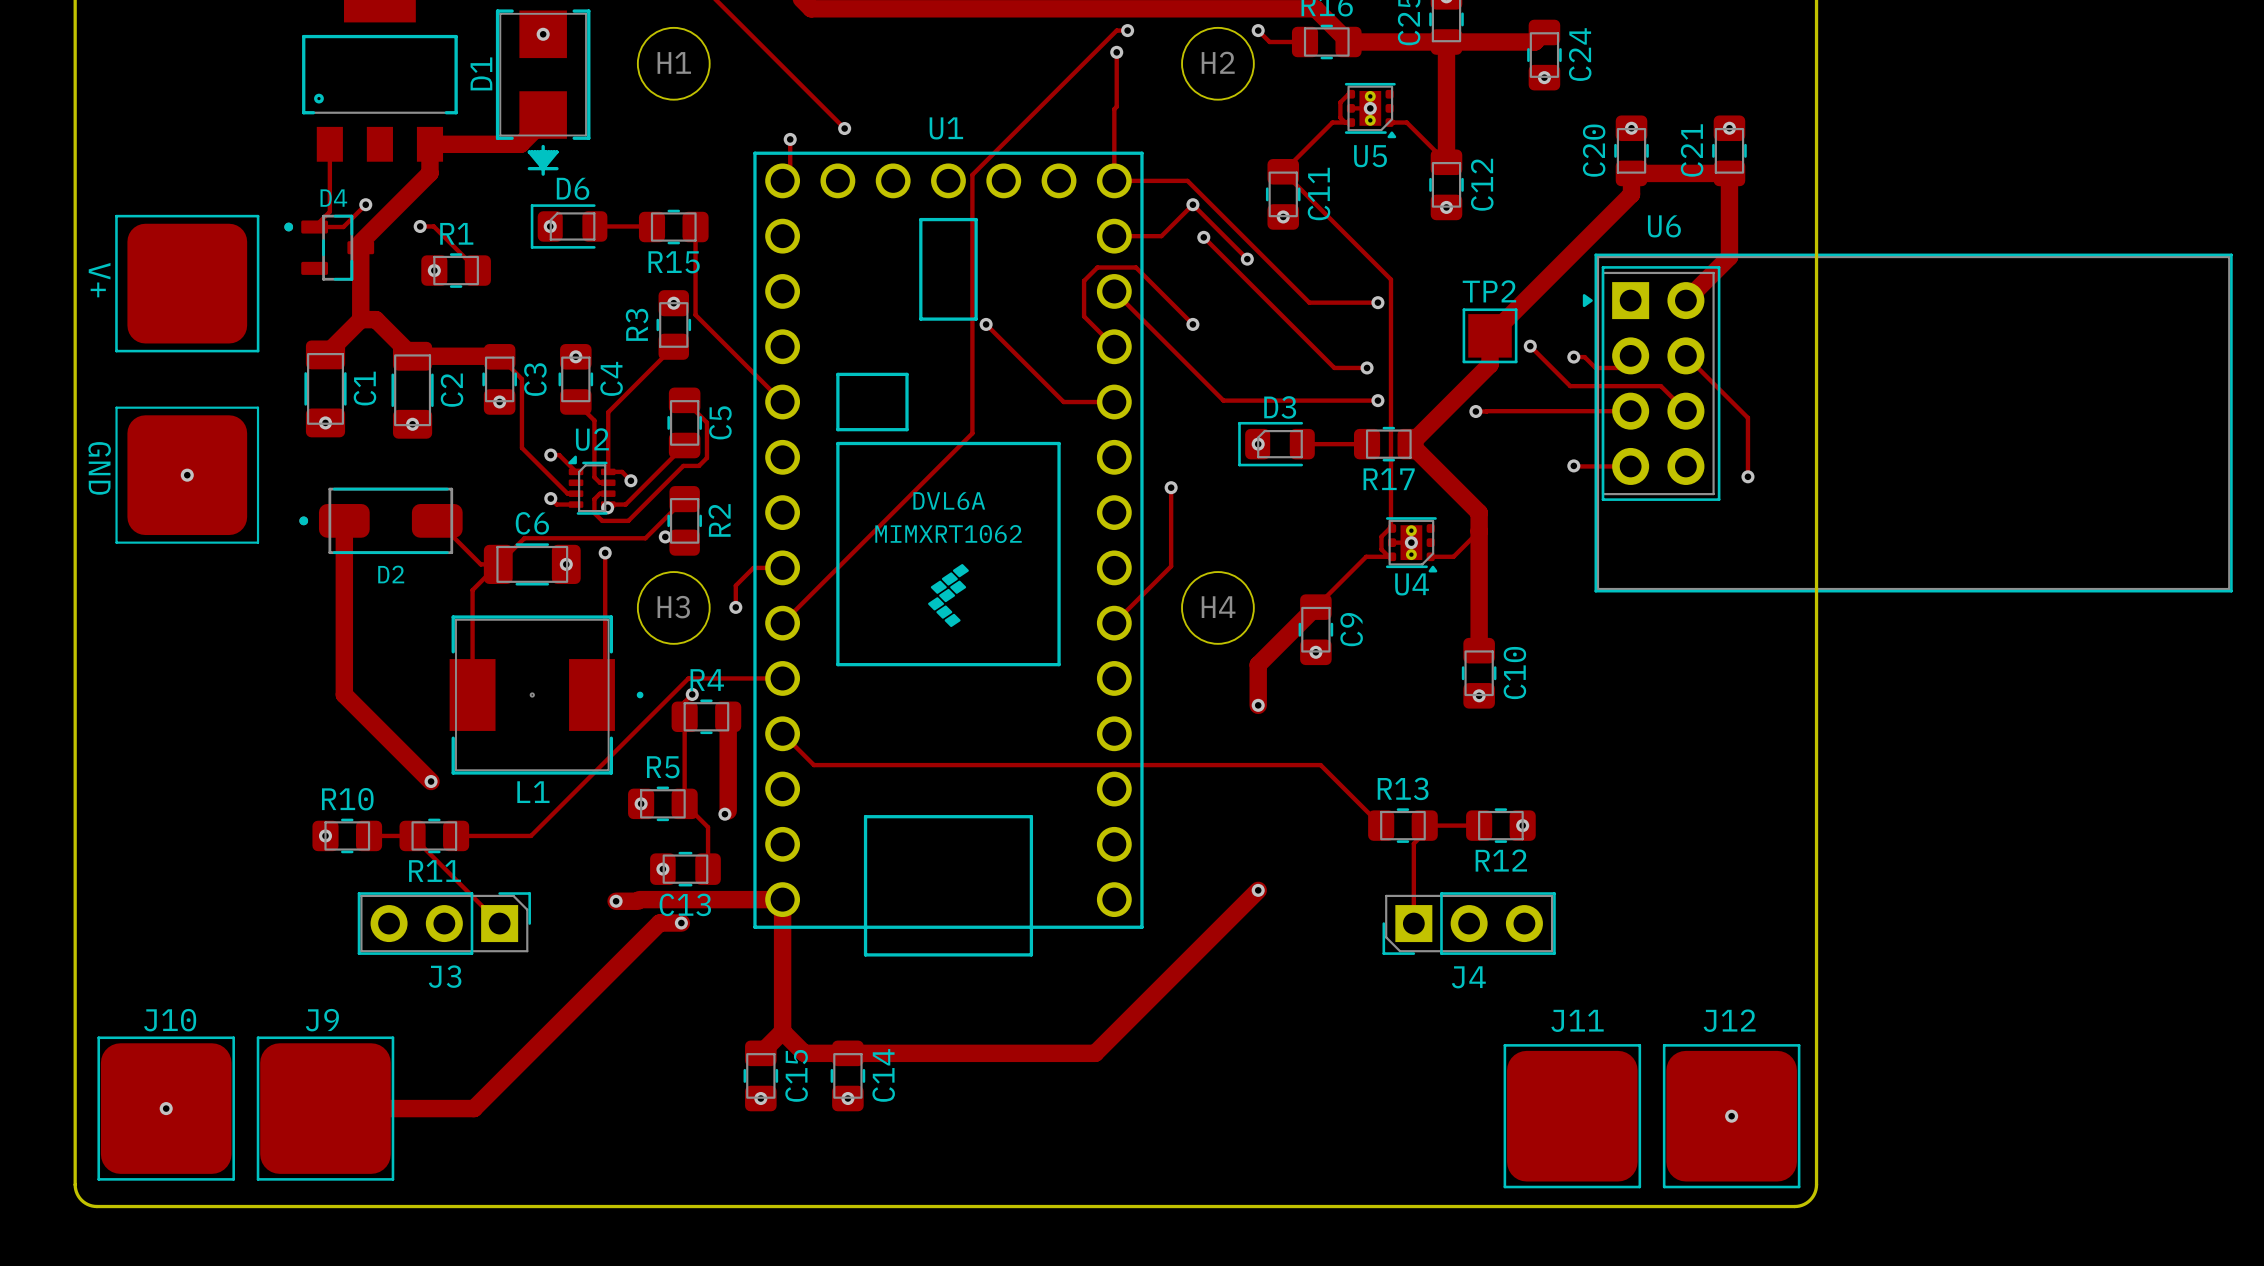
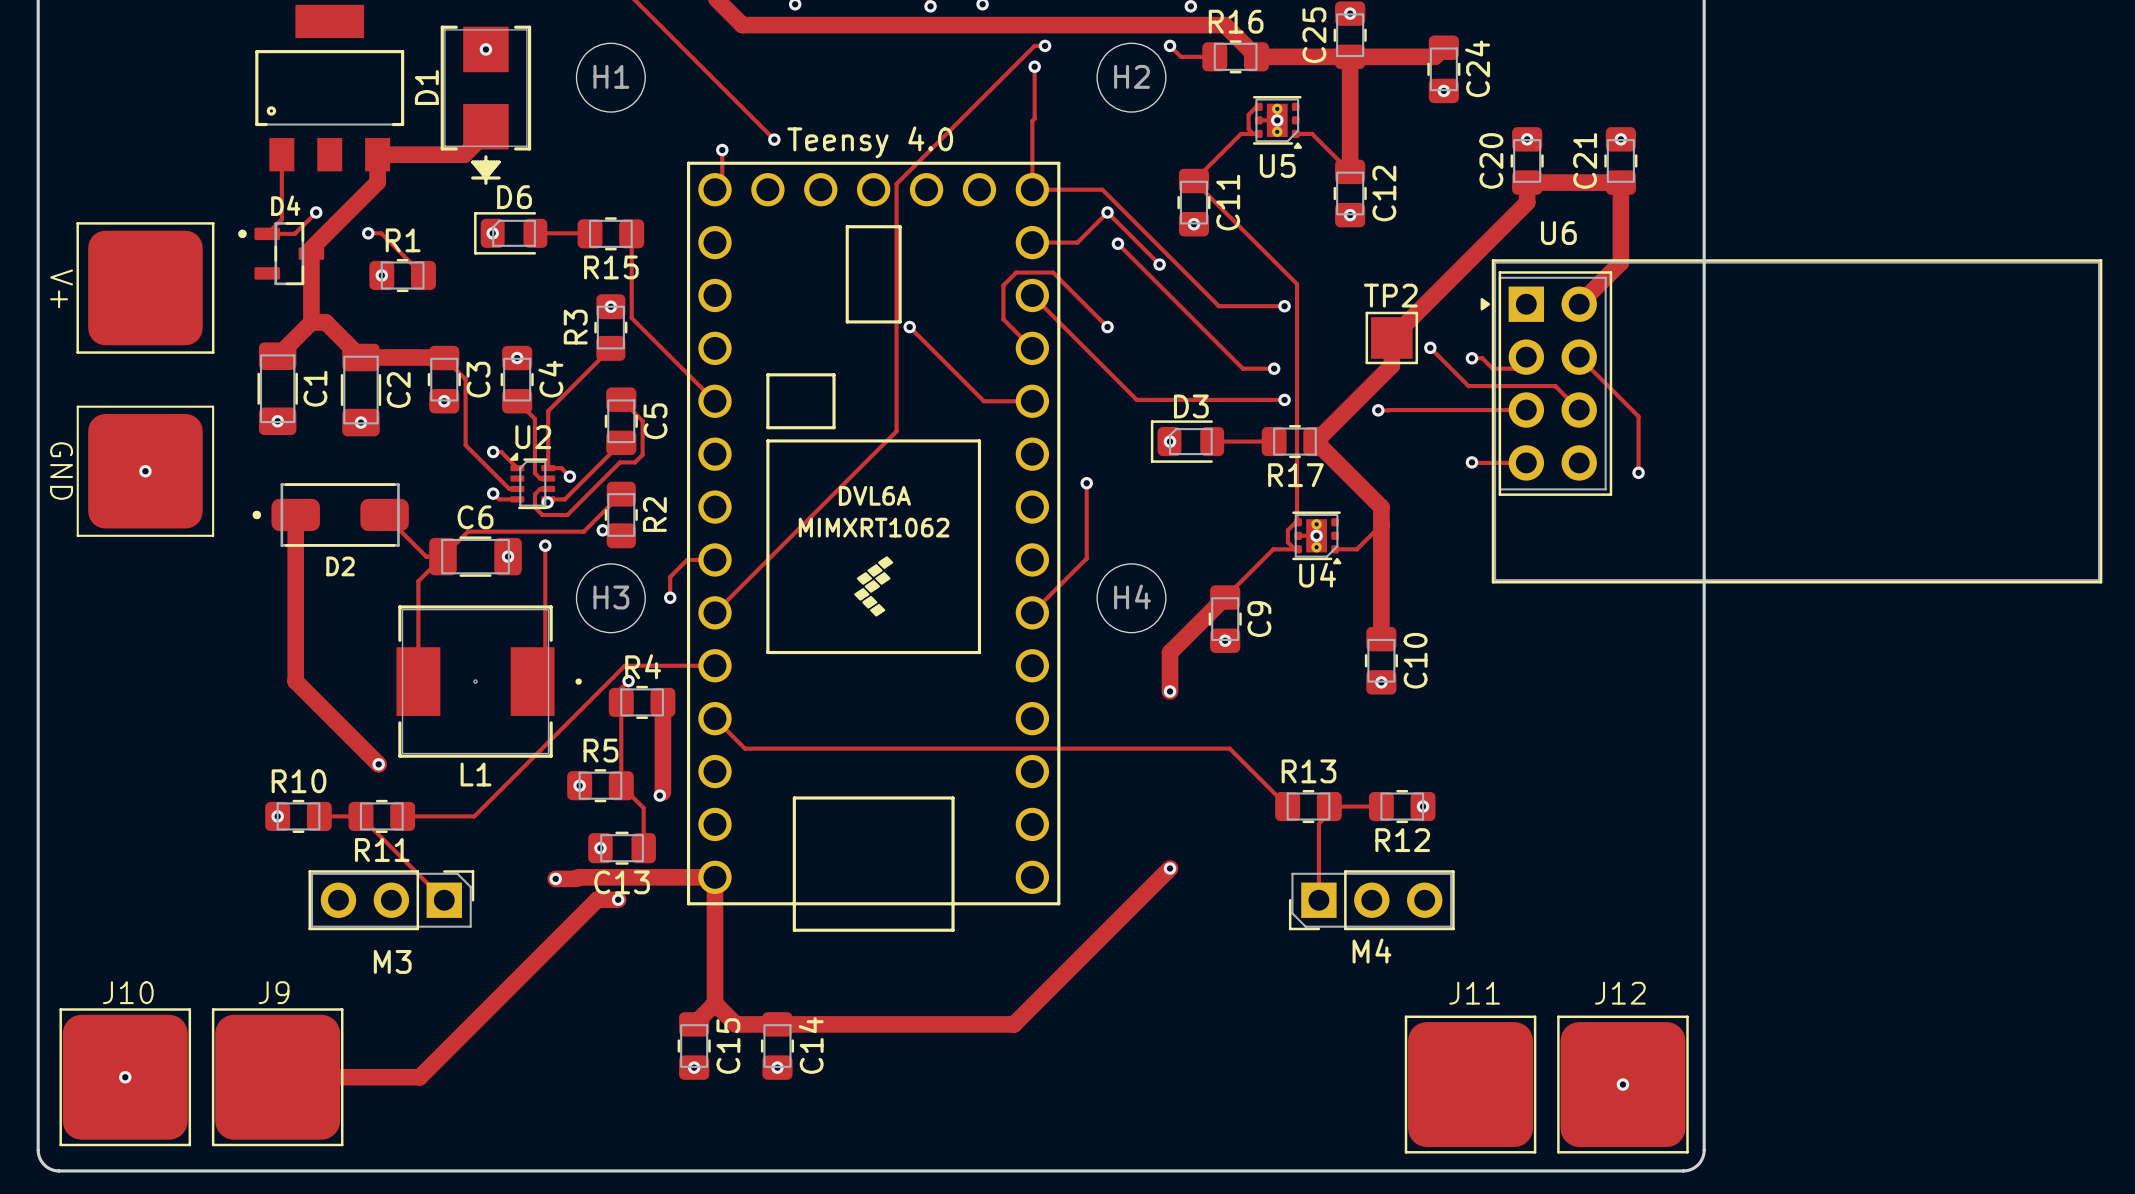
U1 name: U1 (946, 128) -> Teensy 4.0 (870, 142)
J3 name: J3 (445, 976) -> M3 (392, 961)
J4 name: J4 (1468, 977) -> M4 (1371, 951)

